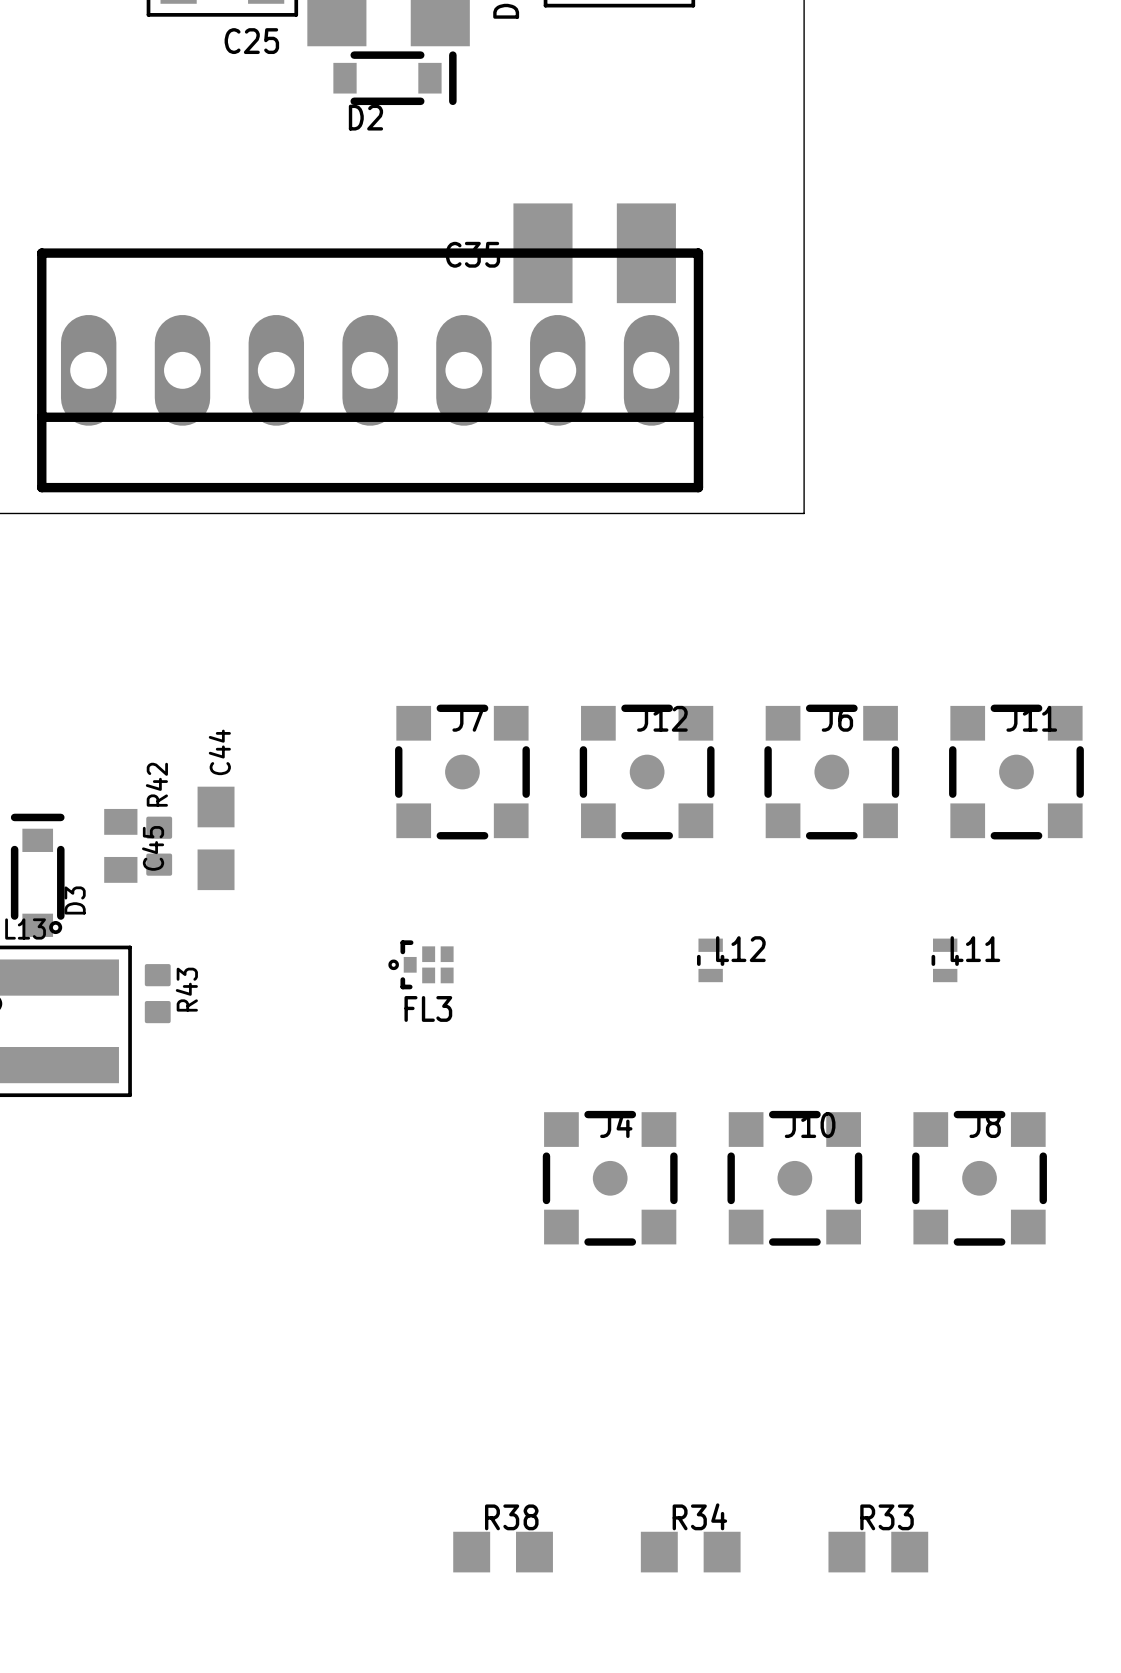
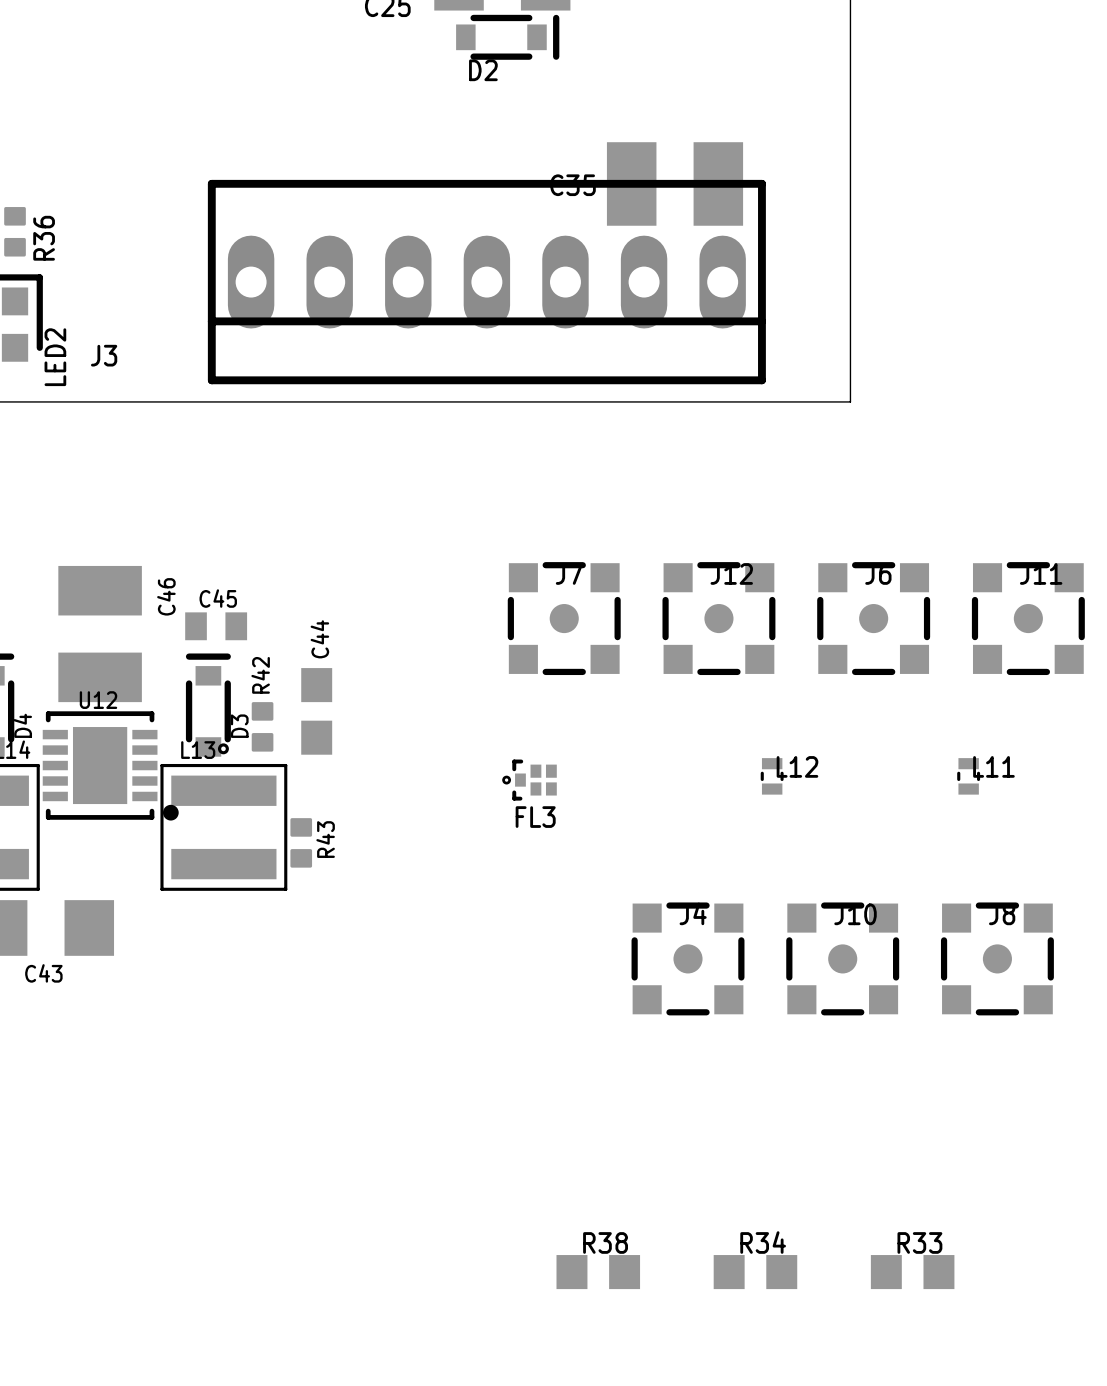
C44 position: (216, 838) -> (316, 711)
C45 rotation: 0° (120, 845) -> 90° clockwise (216, 626)
C45 position: (120, 845) -> (216, 626)
R42 position: (159, 846) -> (262, 726)
R43 position: (157, 993) -> (301, 842)

